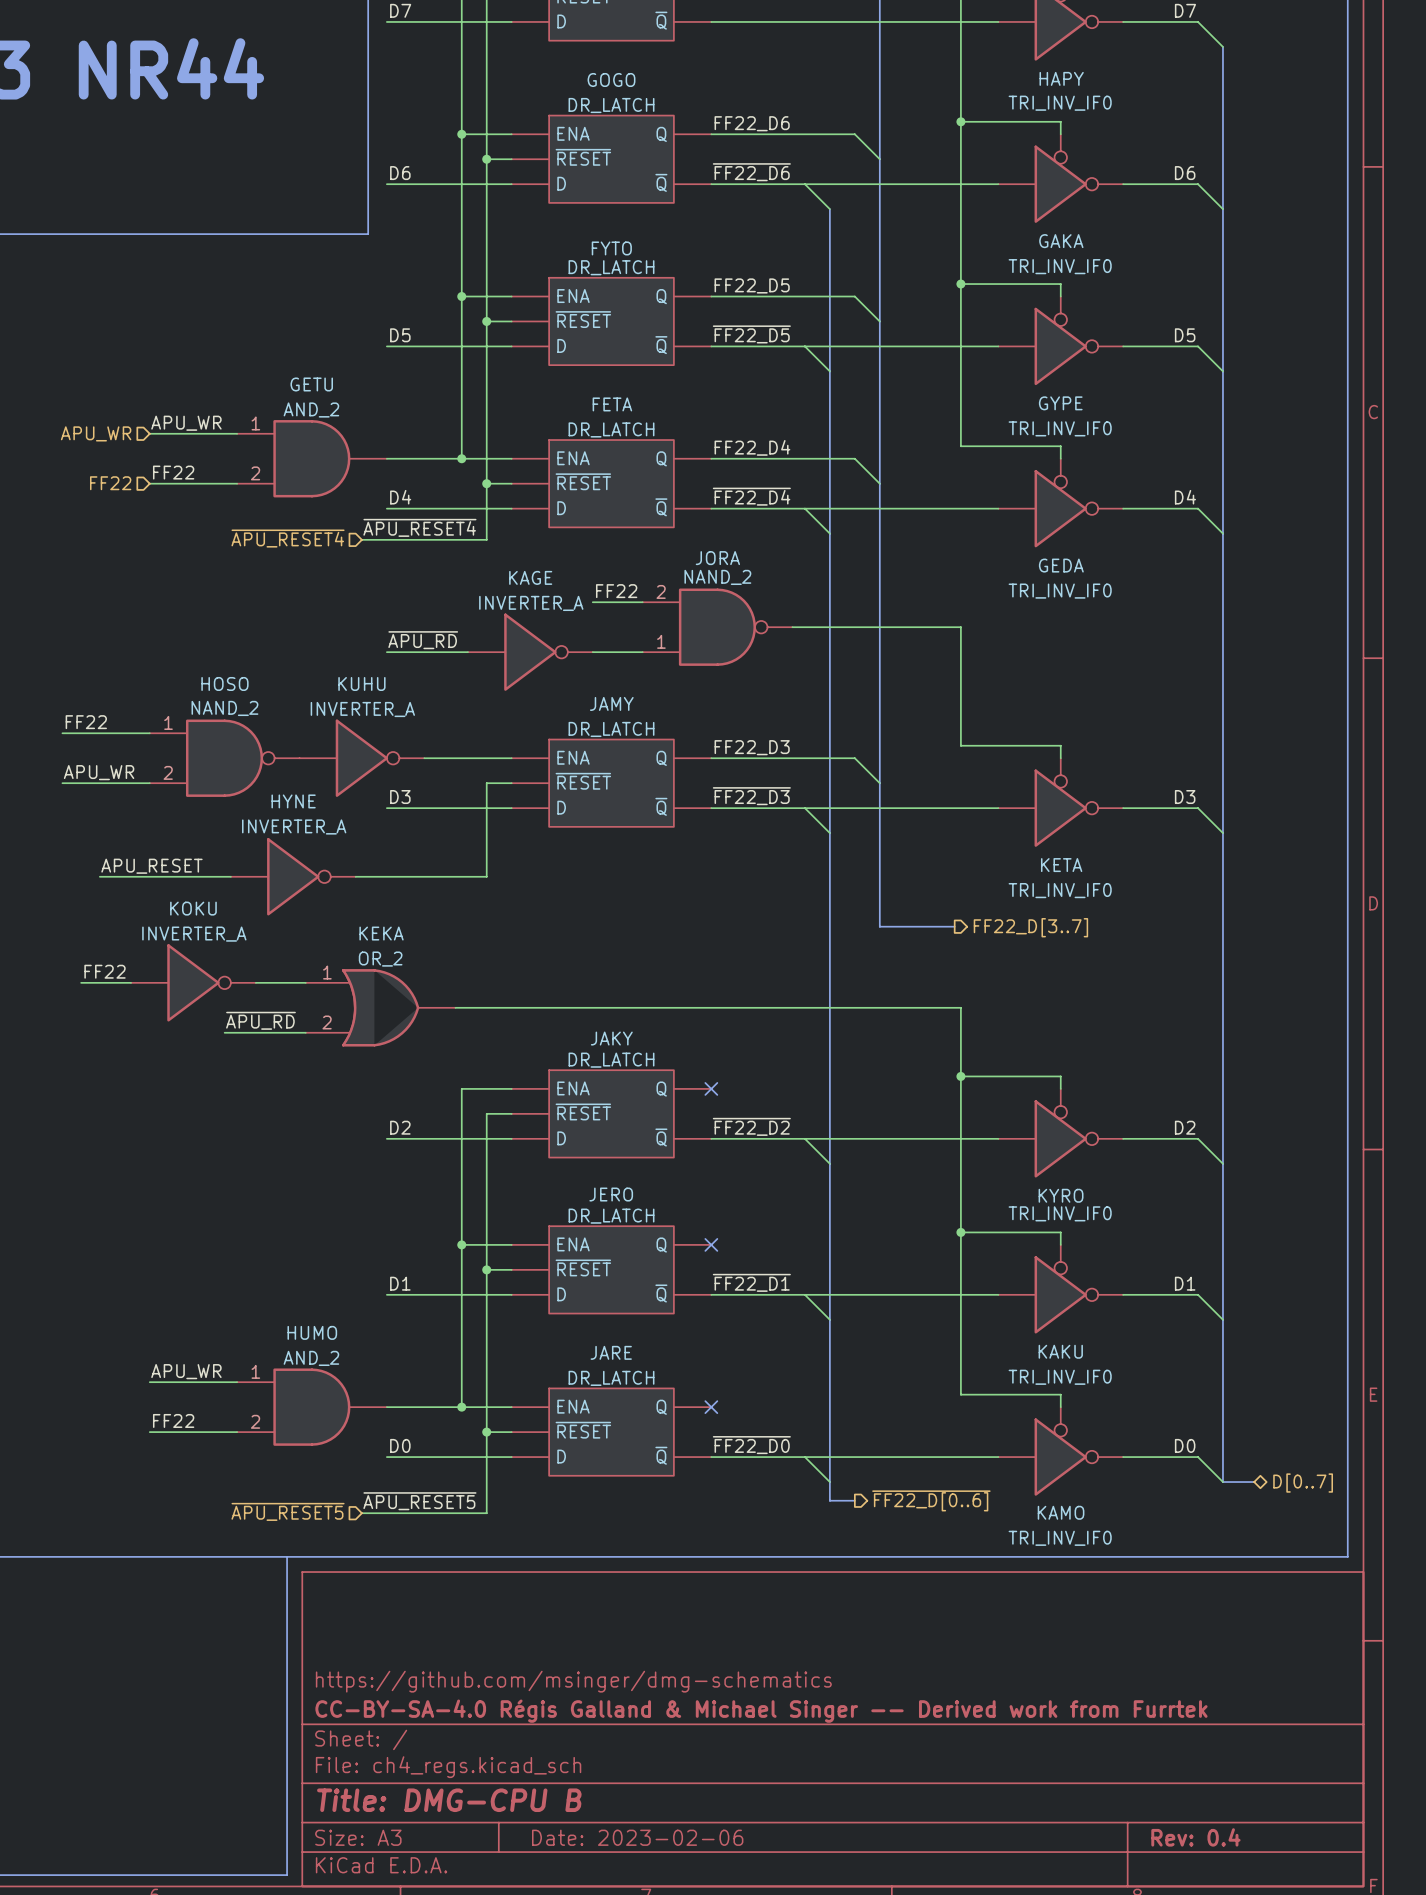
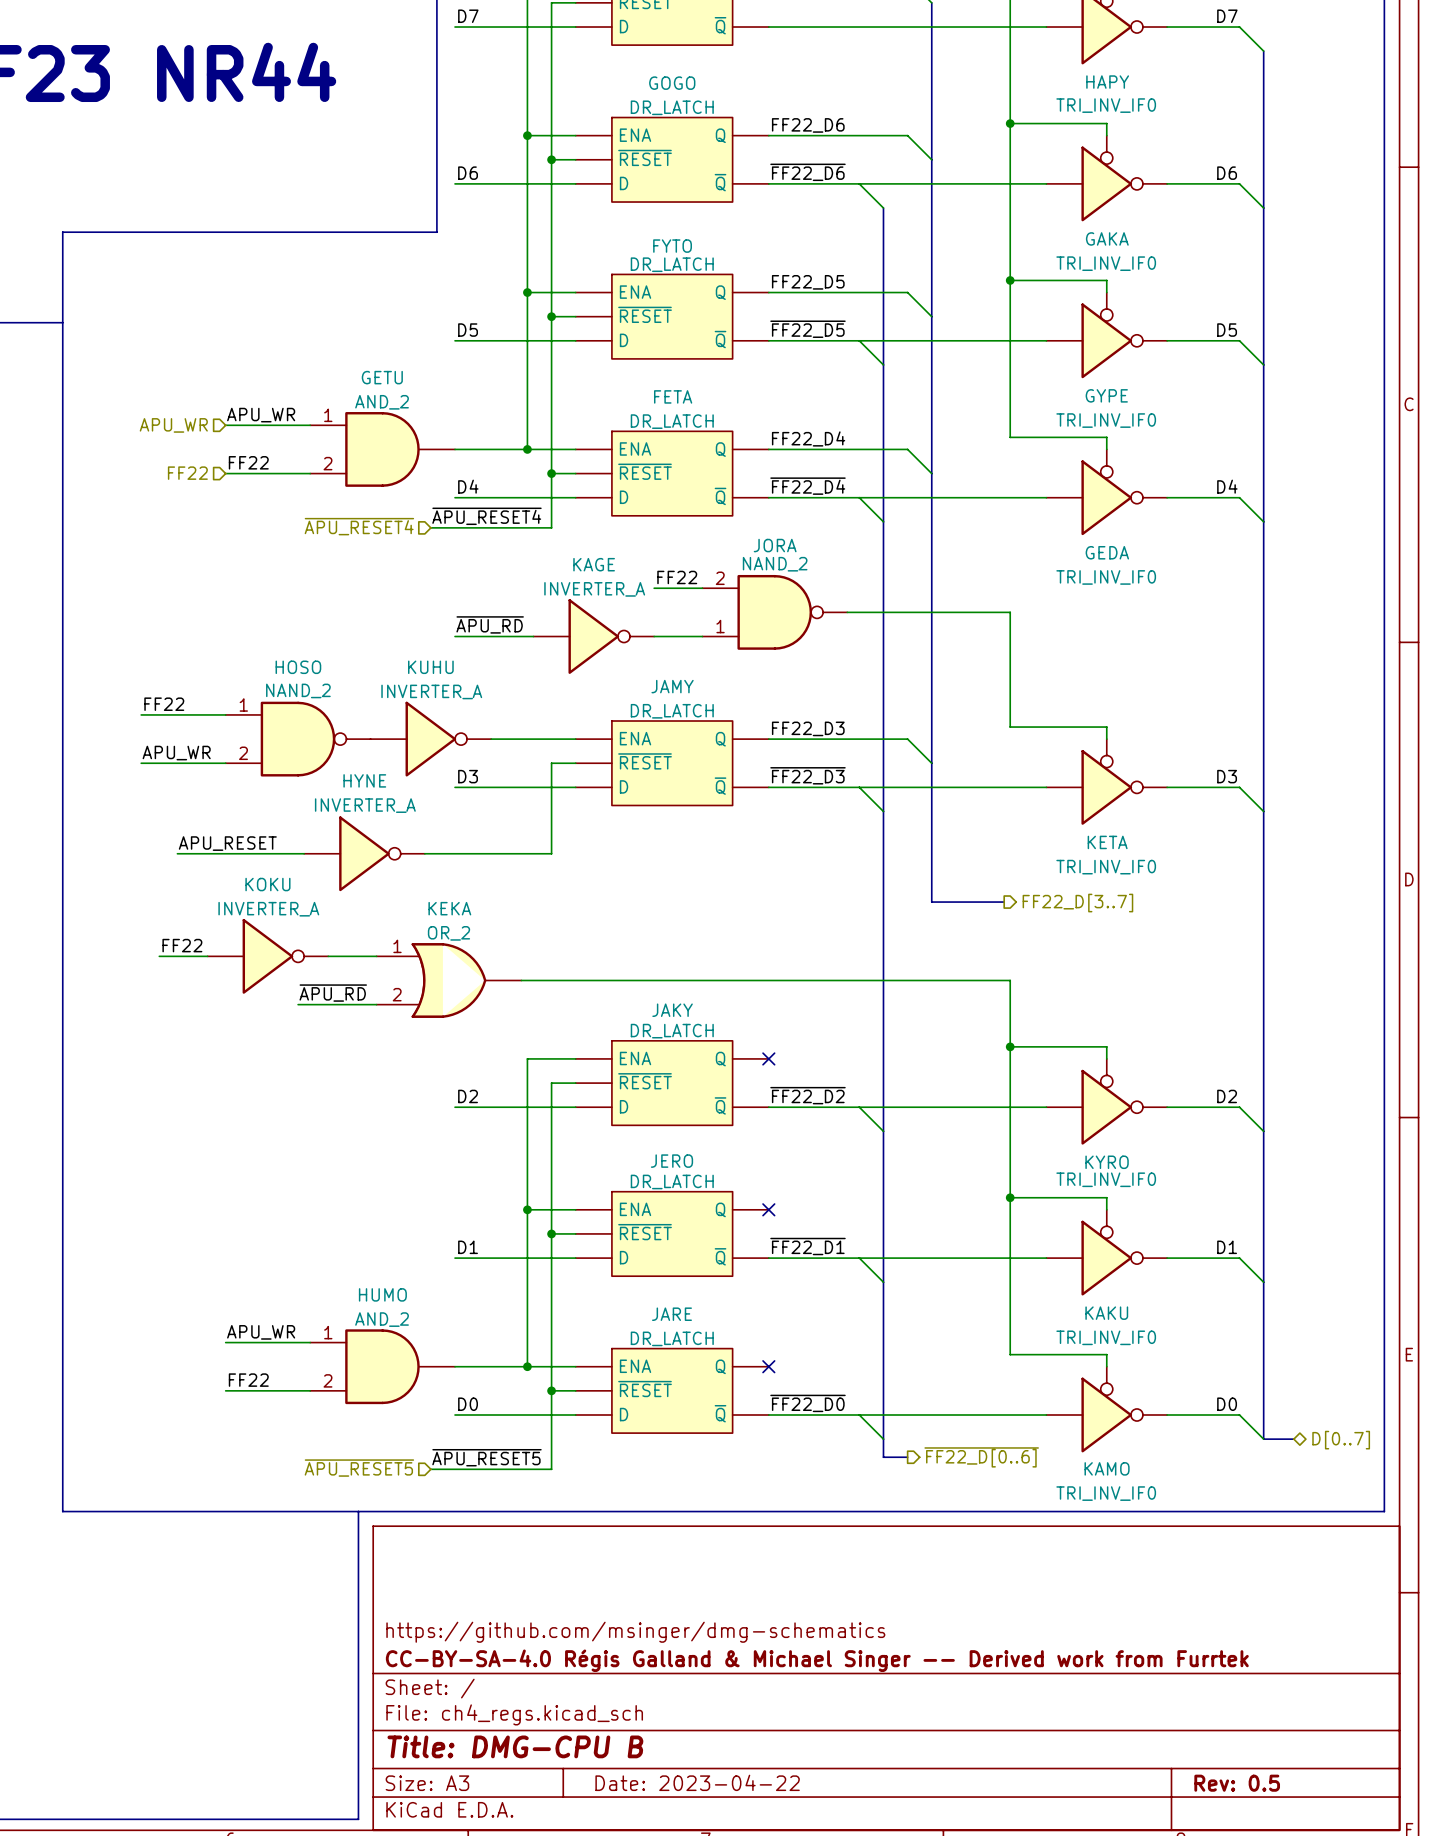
title block: Date: 2023-02-06 (637, 1837) -> Date: 2023-04-22 (697, 1782)
title block: Rev: 0.4 (1195, 1837) -> Rev: 0.5 (1237, 1783)

